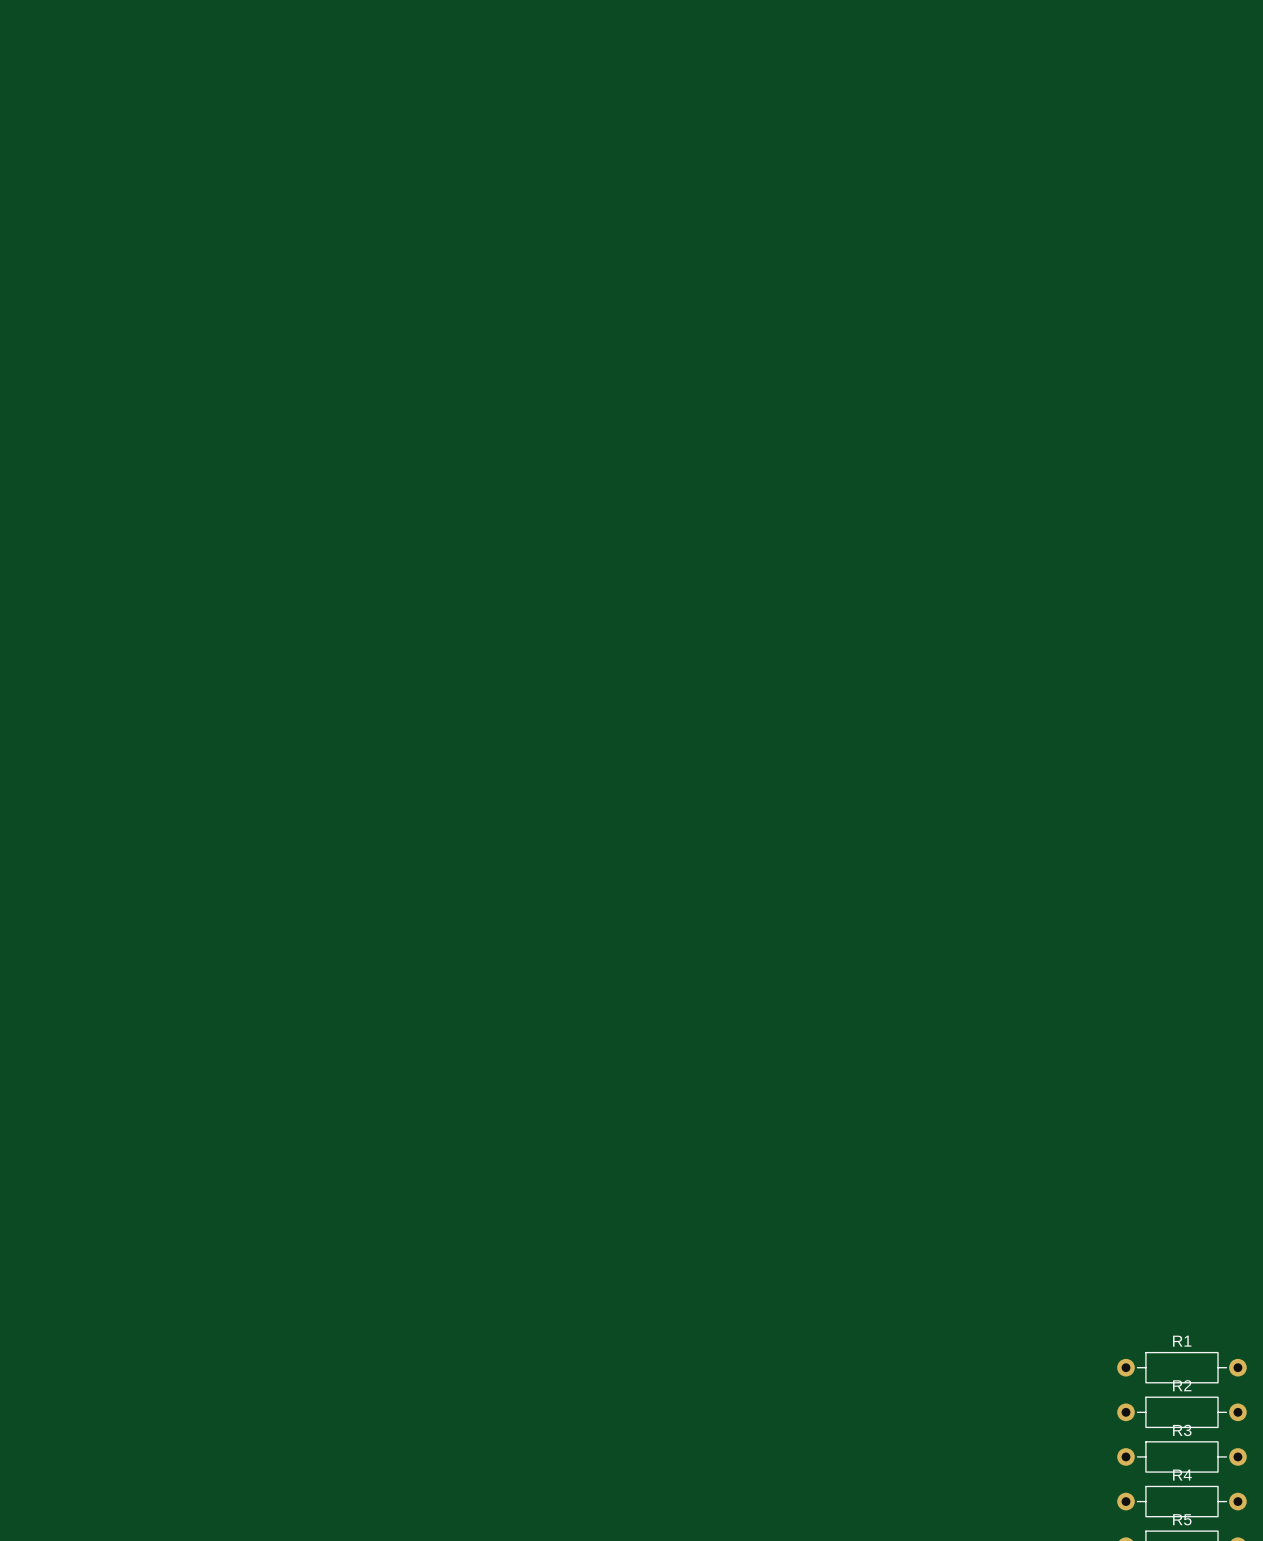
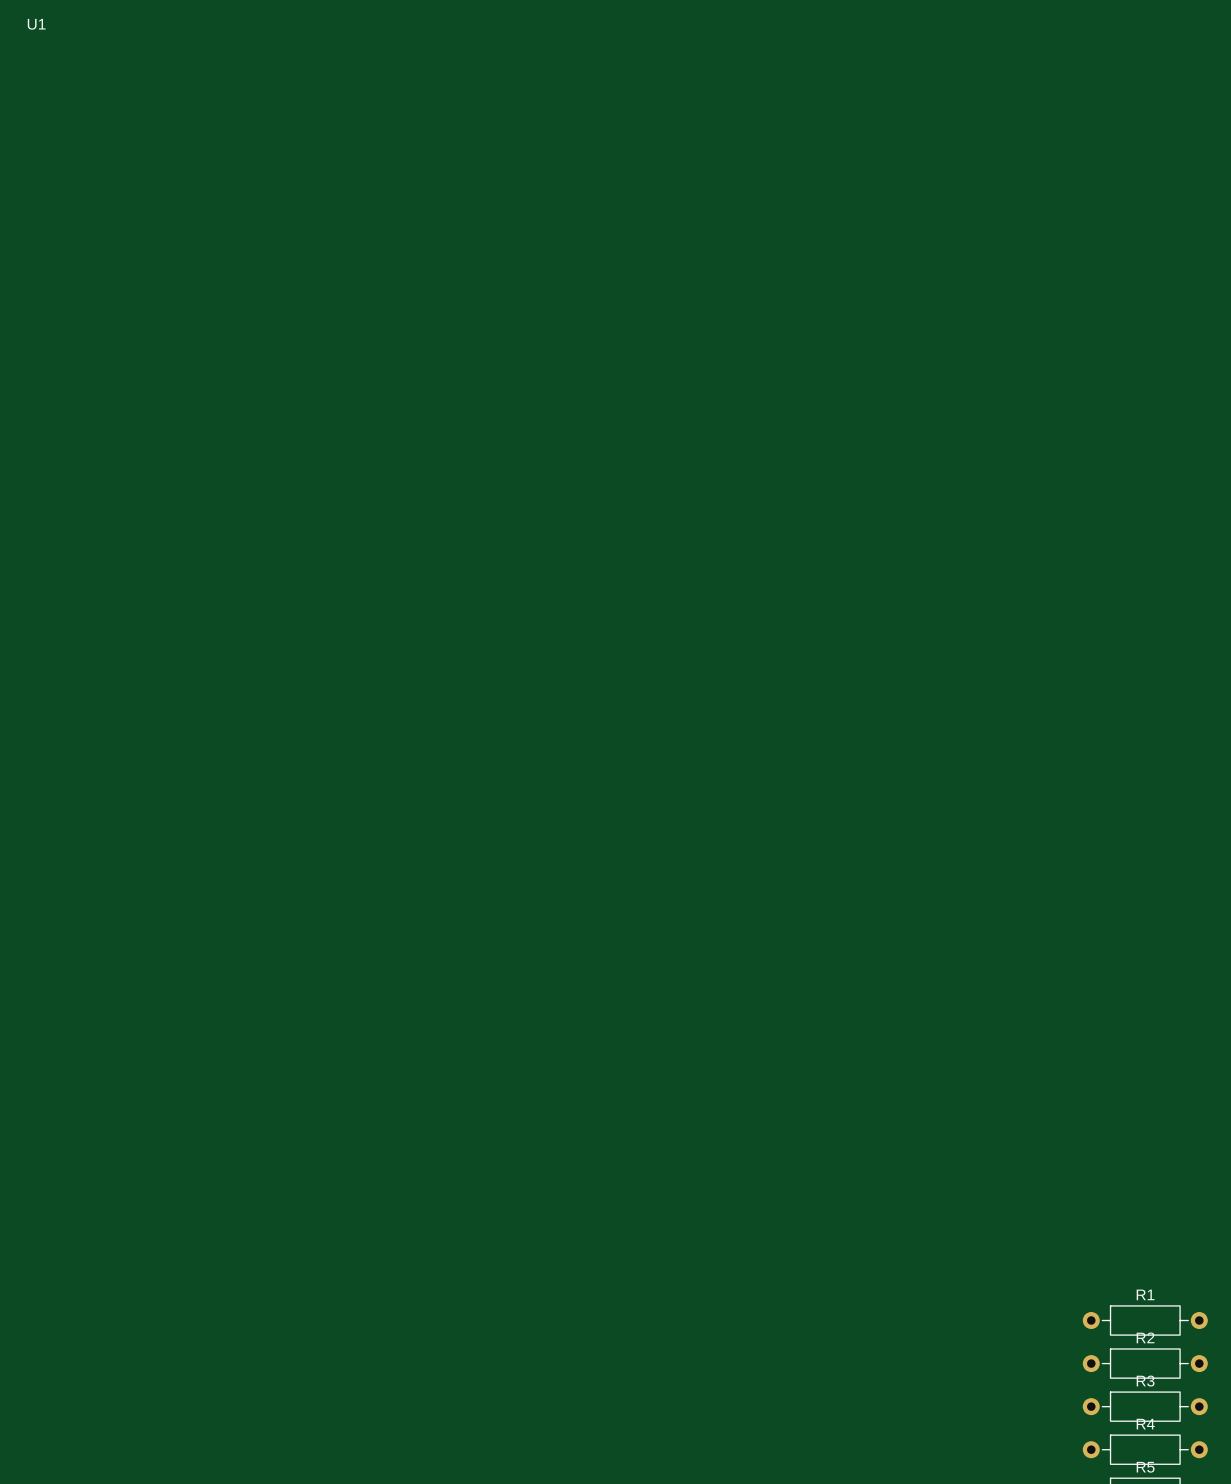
U1: none -> (36, 24)

